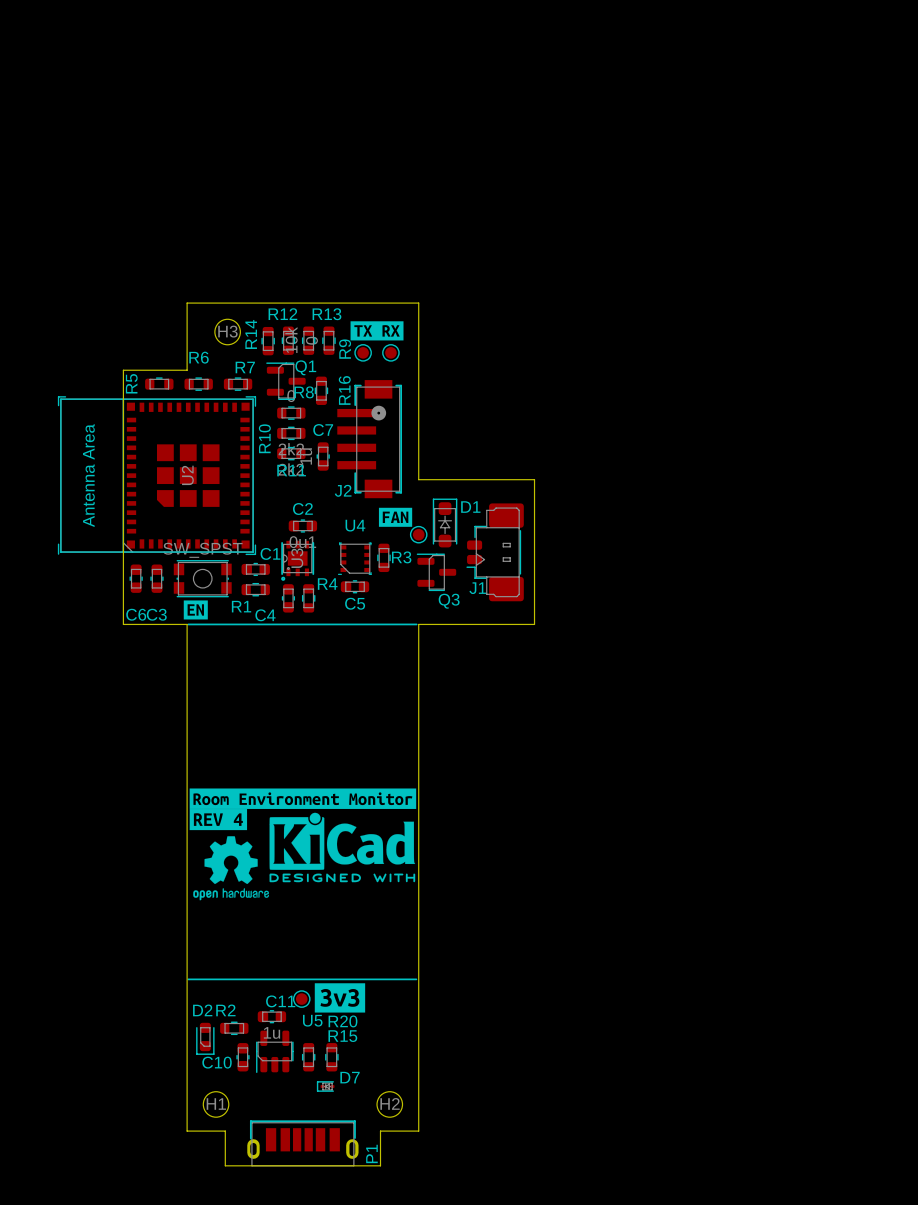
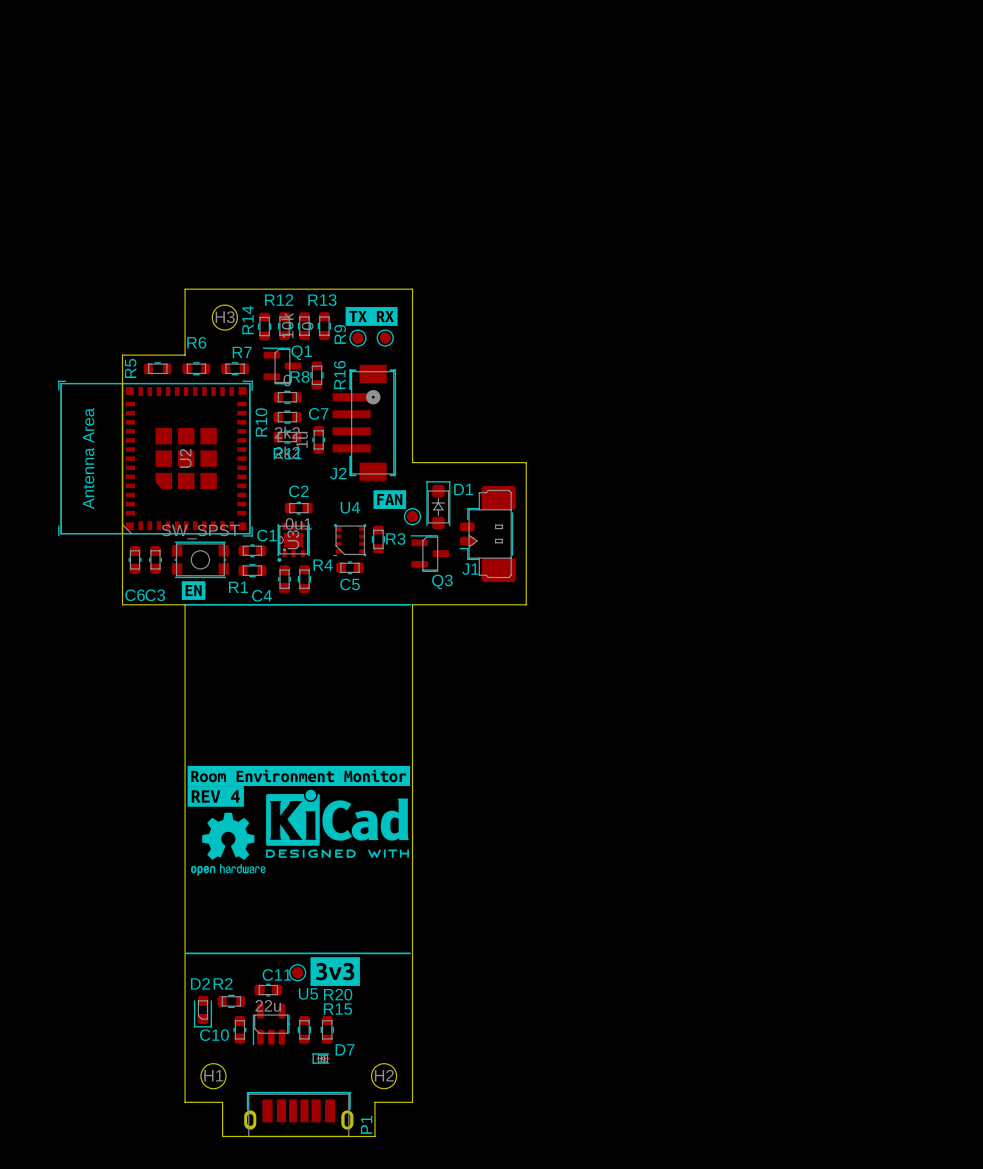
C11 value: 1u (272, 1032) -> 22u (268, 1005)

